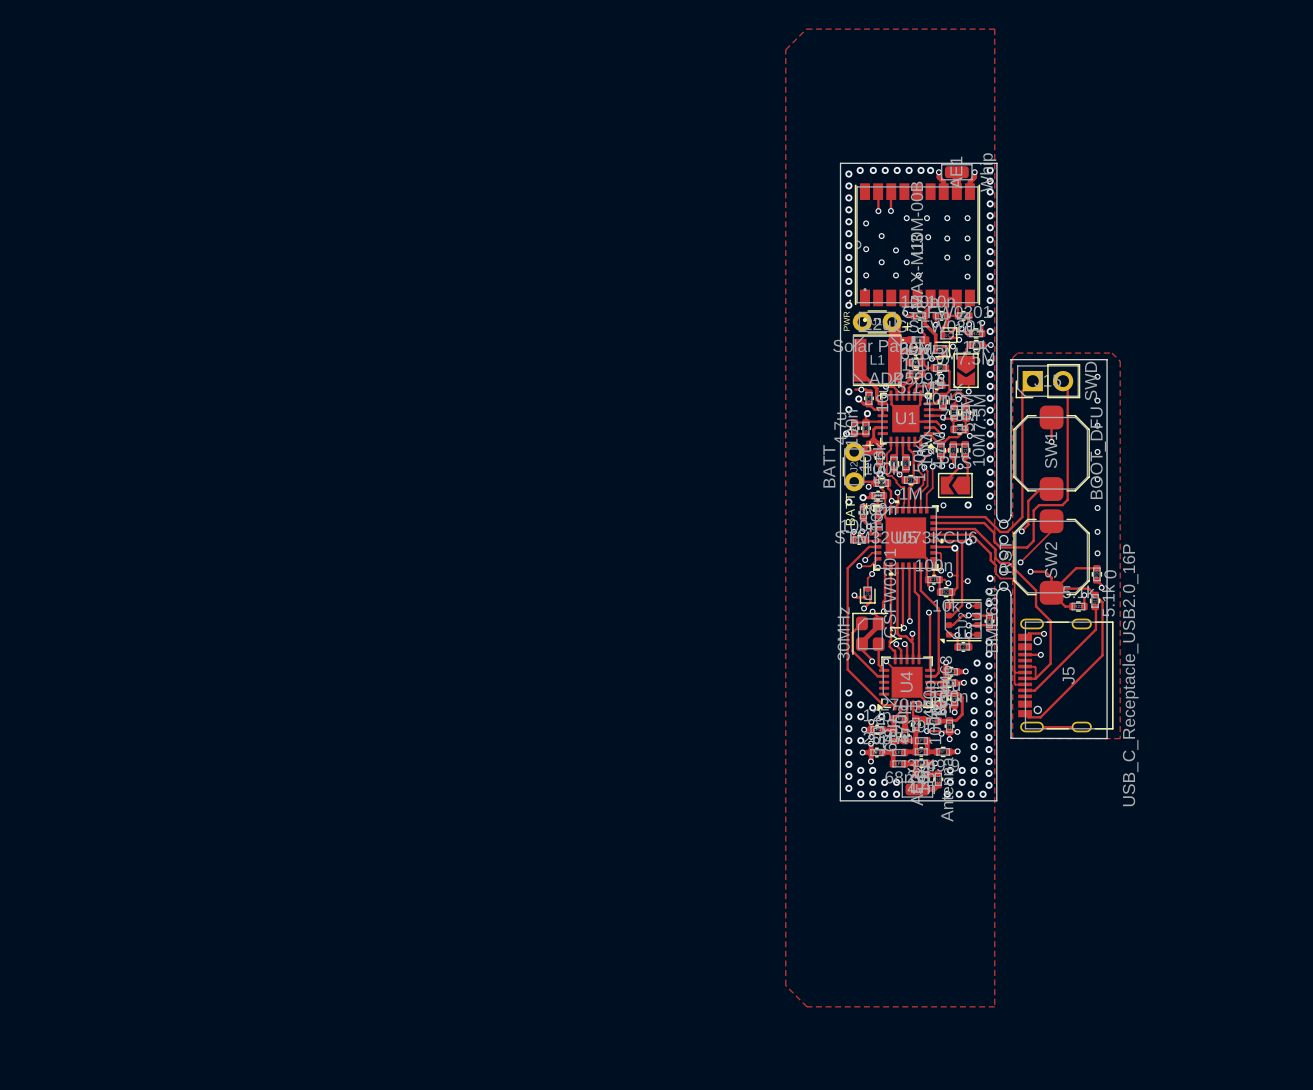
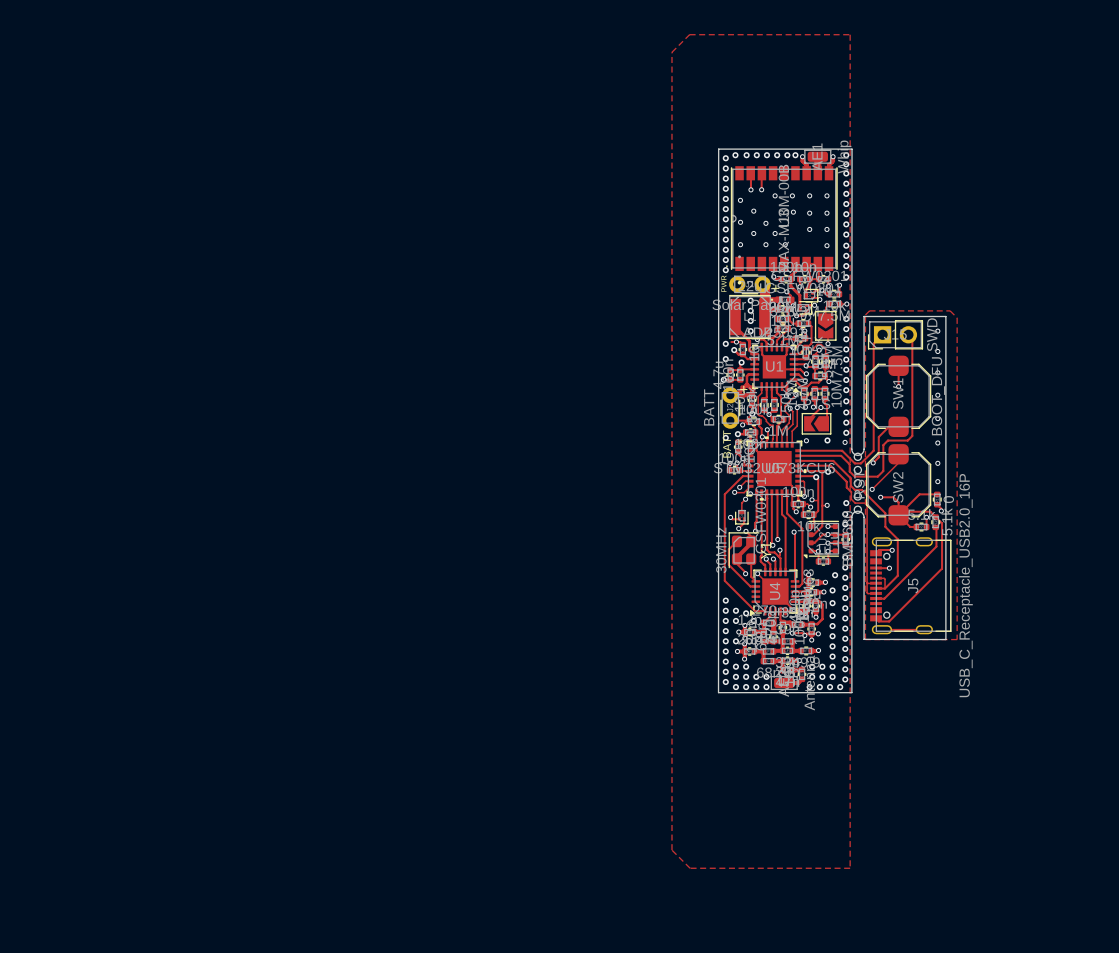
via: (990, 331) -> none
via: none -> (750, 300)
via: none -> (750, 310)
via: none -> (750, 320)
via: none -> (750, 331)

